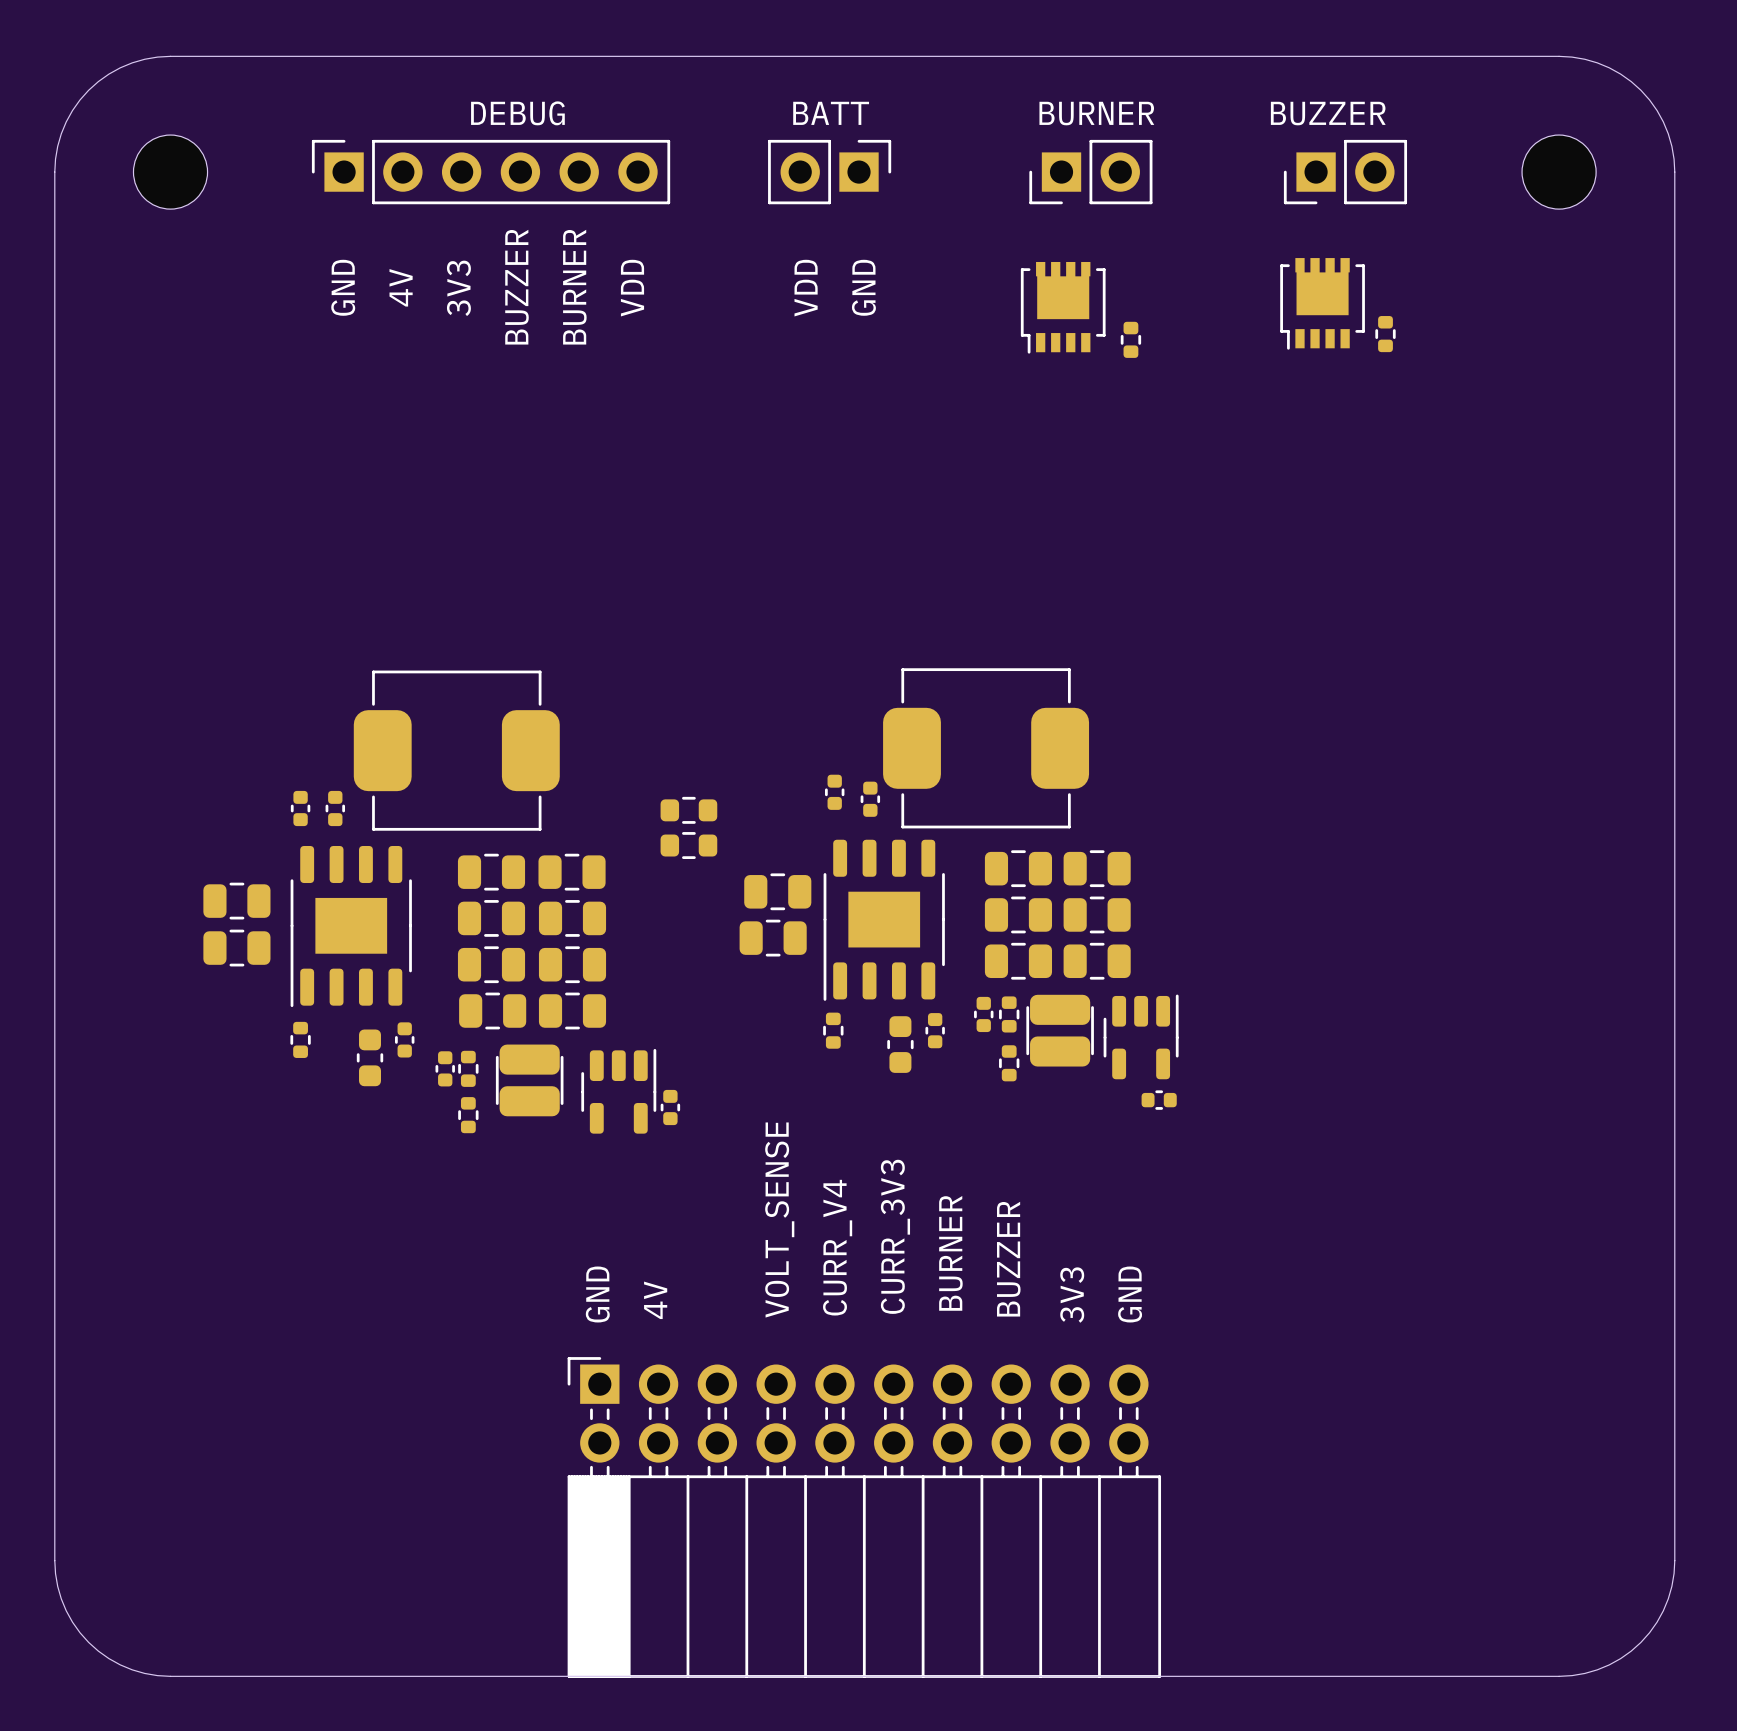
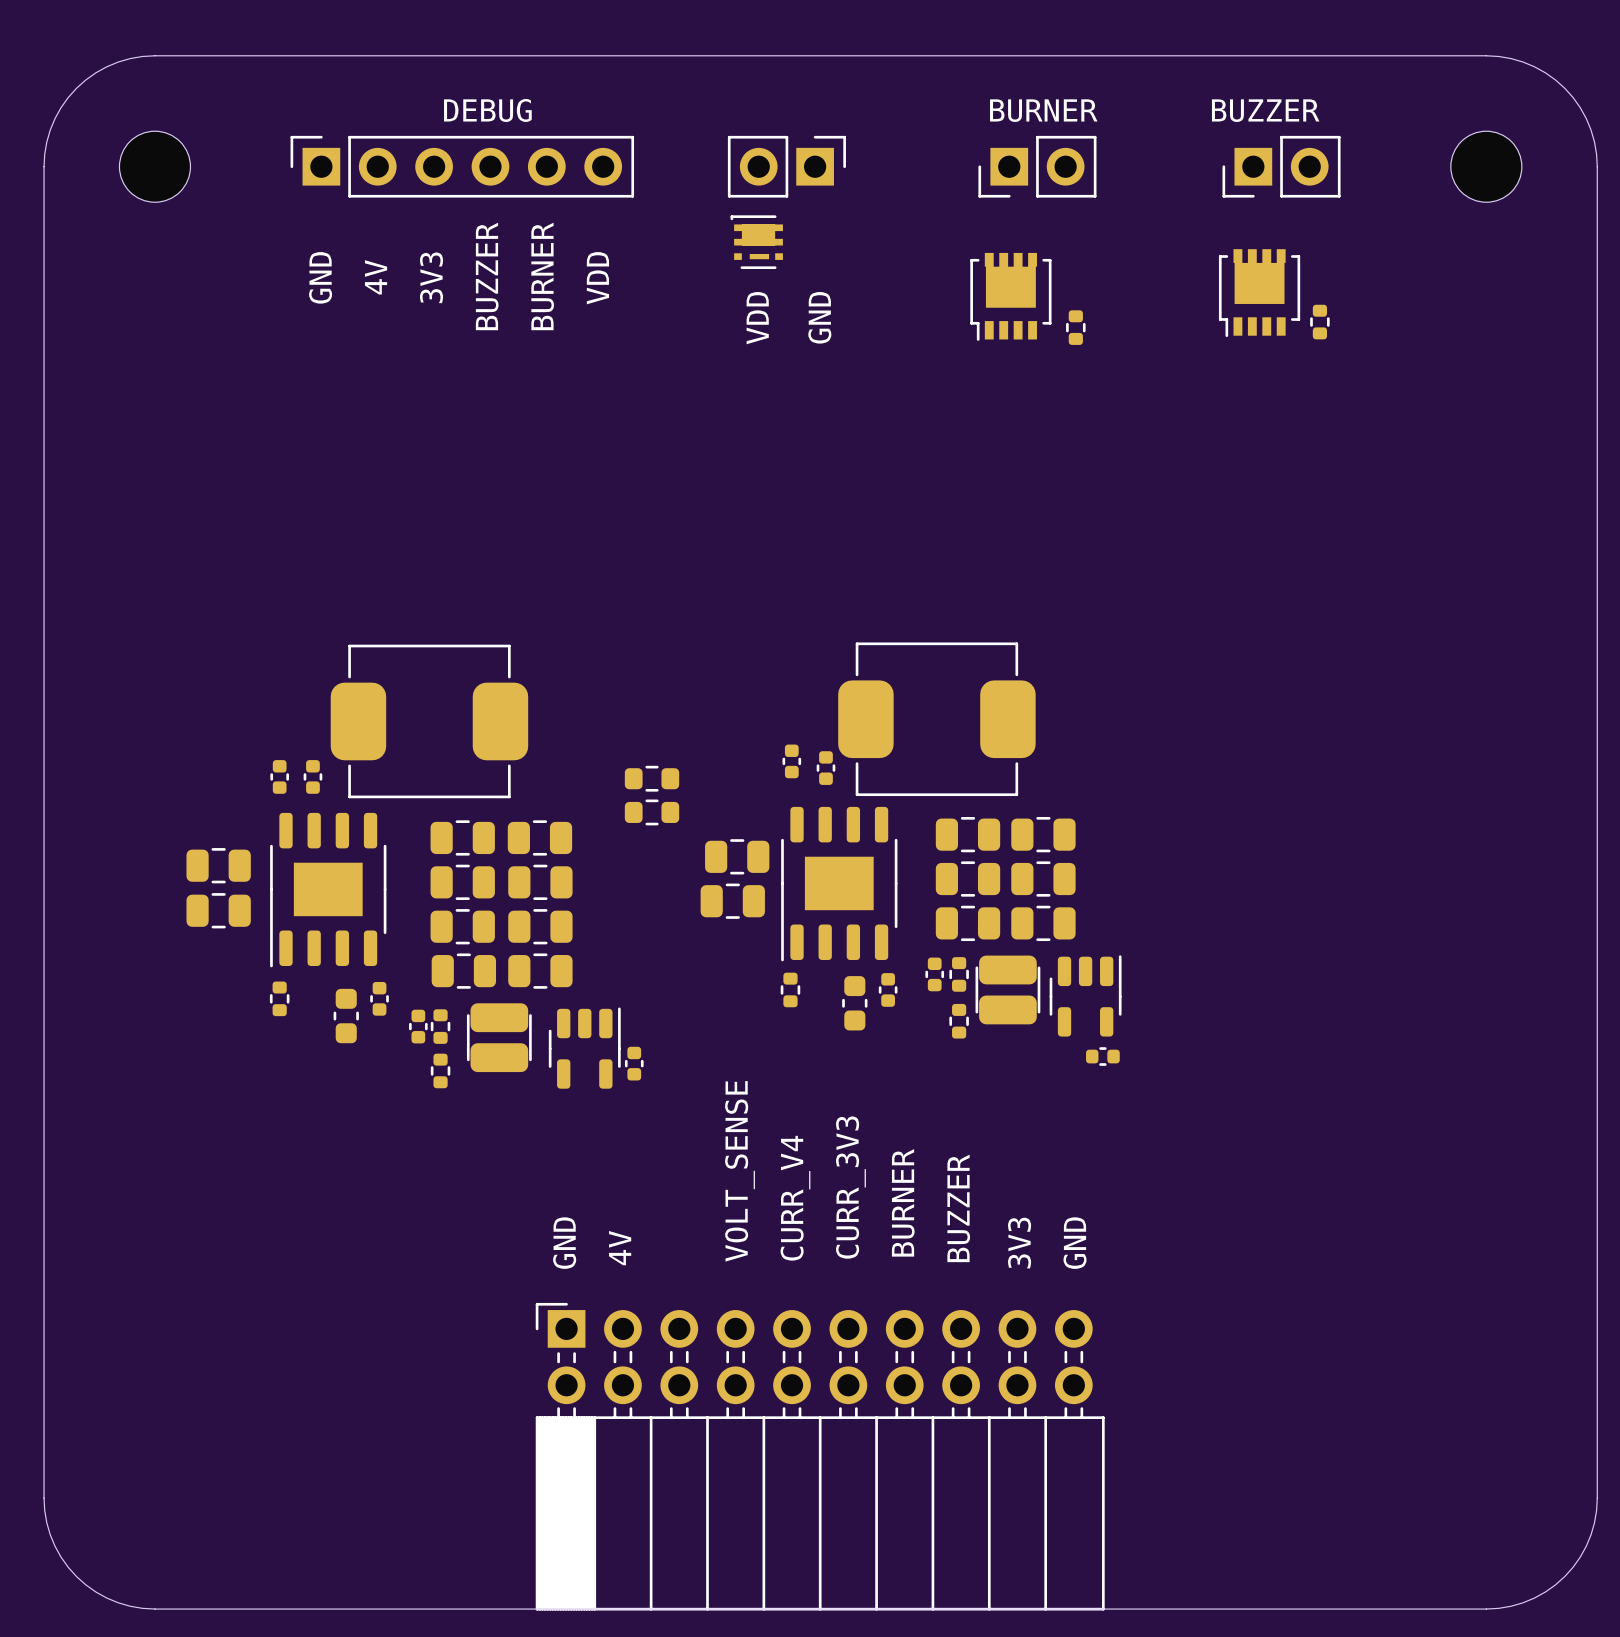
text: BATT (831, 113) -> none
part: none -> (756, 242)
text position: GND (863, 287) -> GND (819, 317)
text position: VDD (806, 288) -> VDD (757, 318)

